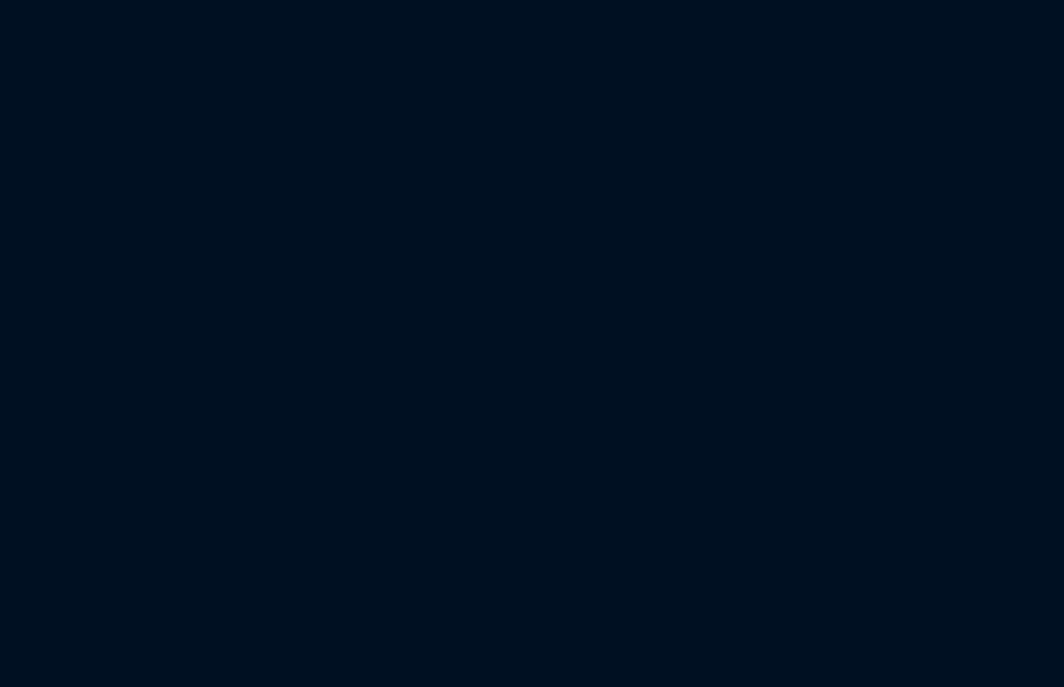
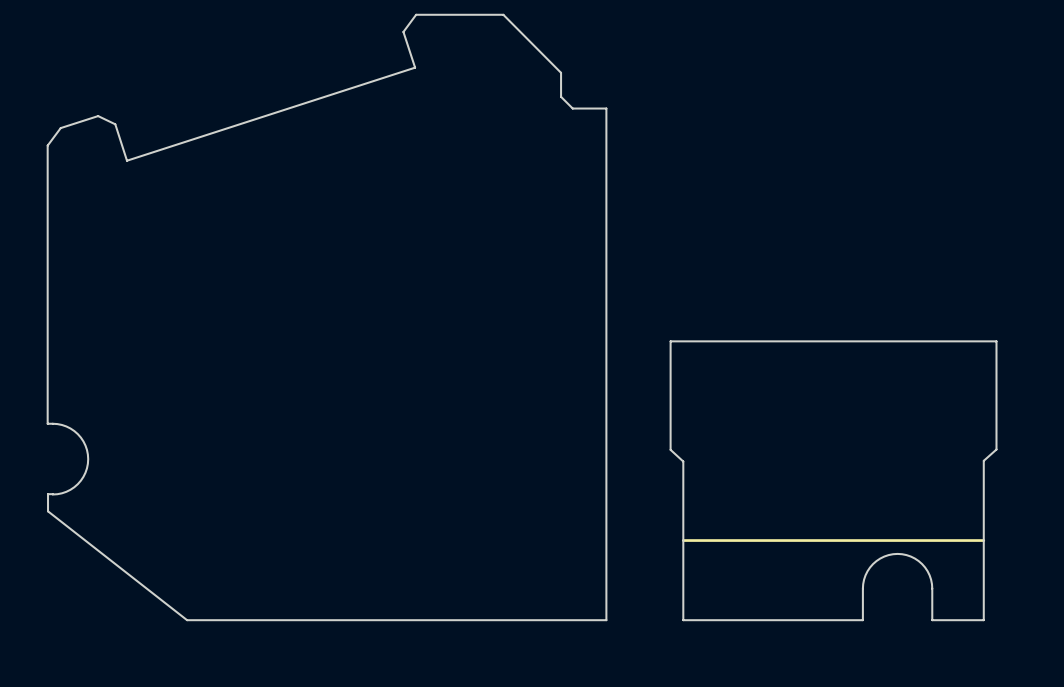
board edge: none -> (670, 341) (670, 449) (683, 461) (683, 620) (862, 620) (863, 584) (867, 571) (880, 558) (897, 553) (914, 558) (927, 571) (931, 584) (932, 620) (983, 620) (983, 460) (996, 449) (996, 341) (670, 341)
board edge: none -> (52, 494) (48, 494) (48, 511) (187, 620) (606, 620) (606, 108) (572, 108) (561, 96) (561, 72) (503, 14) (416, 14) (403, 31) (415, 67) (127, 160) (115, 124) (98, 116) (60, 128) (47, 145) (47, 423) (61, 424) (74, 431) (83, 441) (88, 459) (85, 472) (77, 484) (66, 491) (52, 494)
line: none -> (683, 540) (983, 540)

